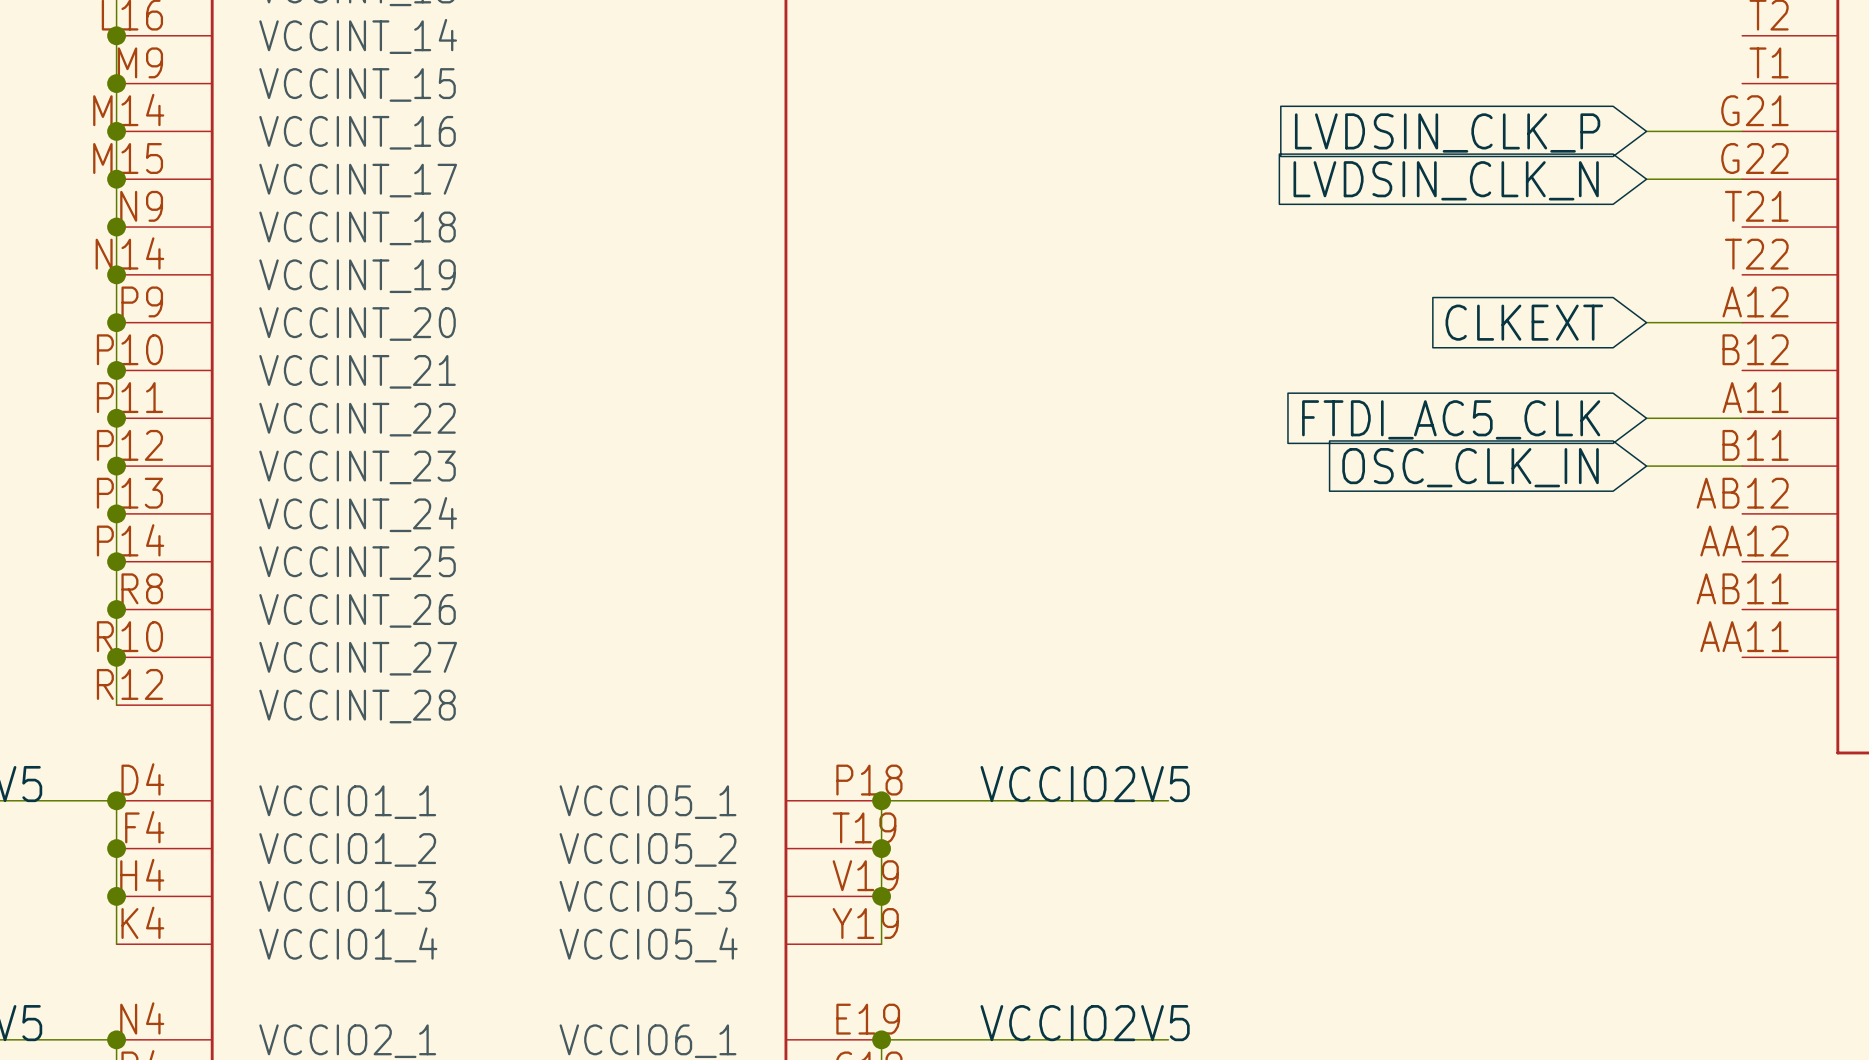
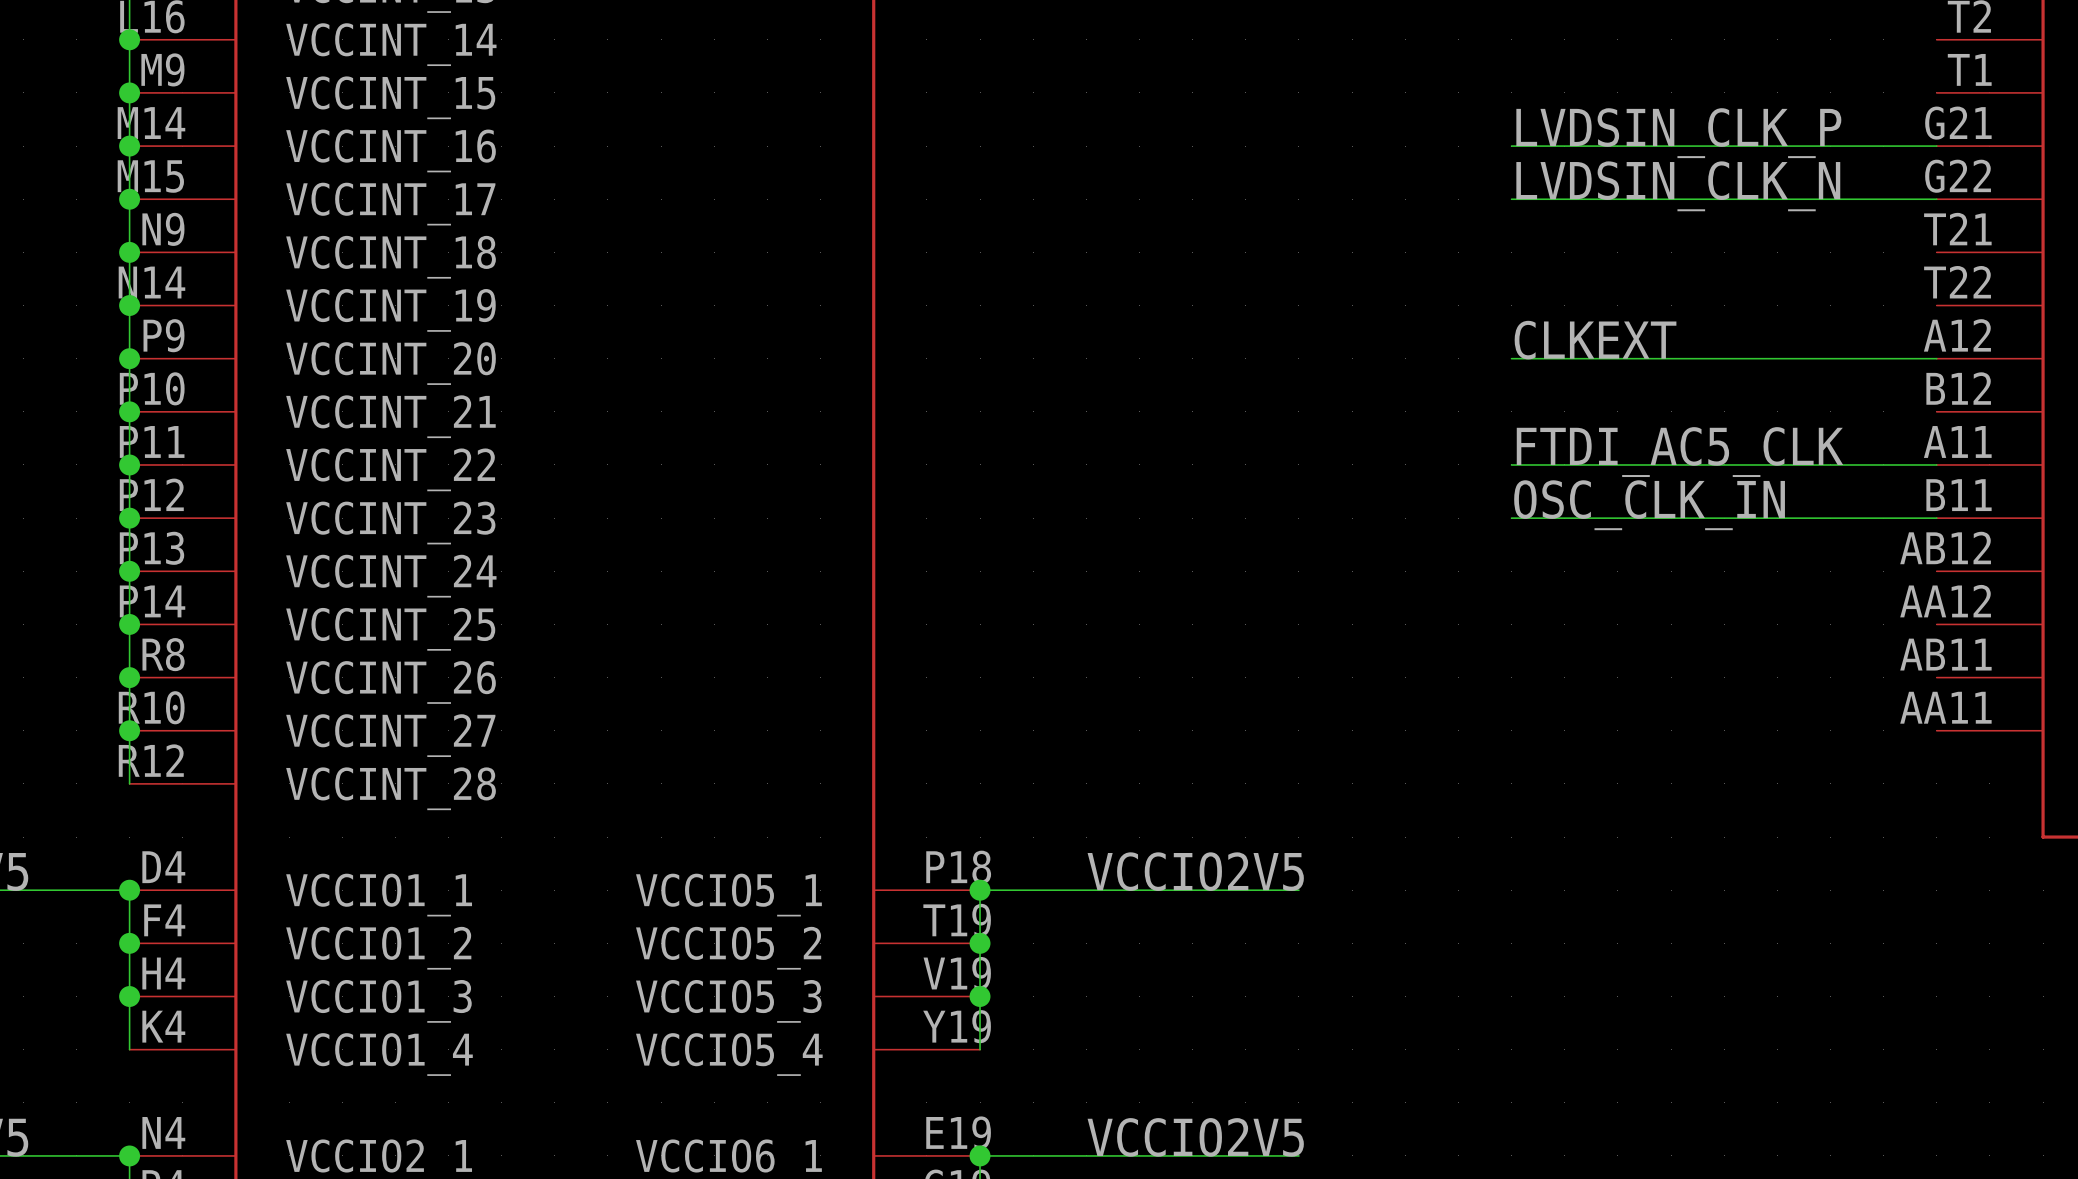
label: none -> LVDSIN_CLK_P (1678, 133)
wire: none -> (1511, 146) (1830, 146)
global label: LVDSIN_CLK_P (1447, 132) -> none
label: none -> LVDSIN_CLK_N (1678, 186)
wire: none -> (1511, 199) (1830, 199)
global label: LVDSIN_CLK_N (1446, 180) -> none
label: none -> CLKEXT (1595, 340)
wire: none -> (1511, 358) (1830, 358)
global label: CLKEXT (1524, 322) -> none
label: none -> FTDI_AC5_CLK (1679, 452)
wire: none -> (1511, 464) (1830, 464)
global label: FTDI_AC5_CLK (1451, 419) -> none
label: none -> OSC_CLK_IN (1649, 505)
wire: none -> (1511, 518) (1830, 518)
global label: OSC_CLK_IN (1470, 467) -> none

